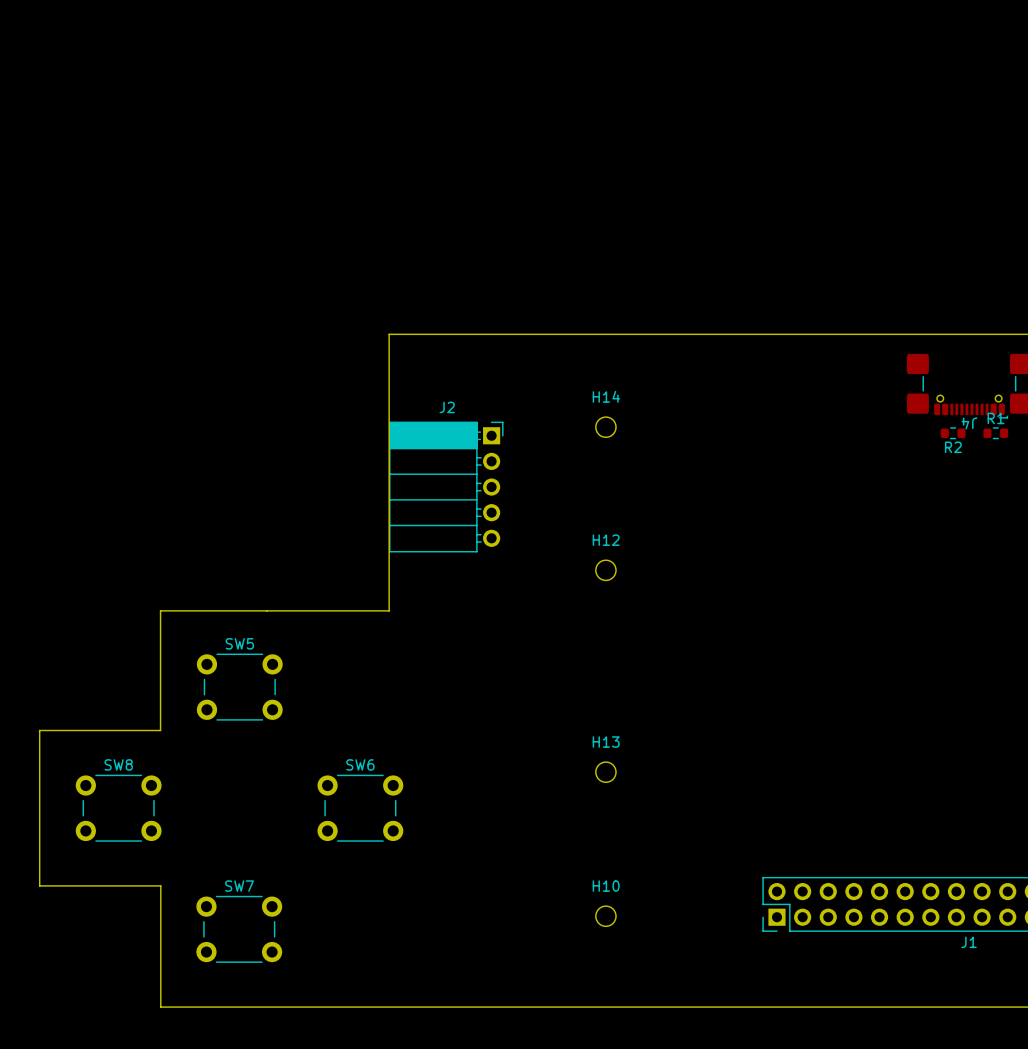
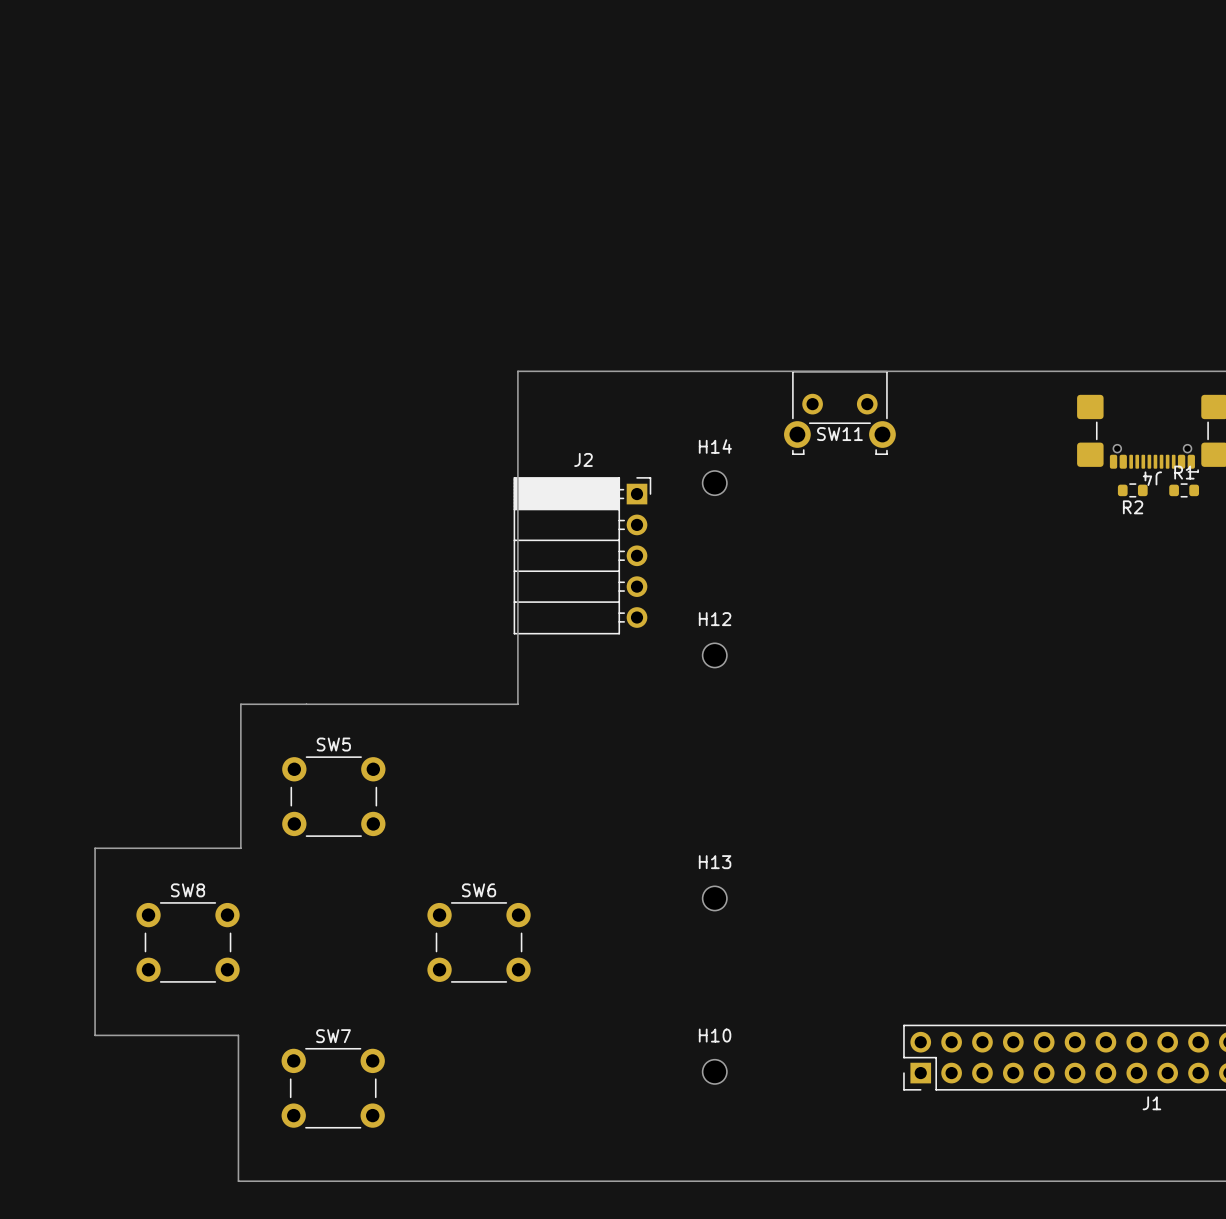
board edge: (442, 334) (389, 334) (389, 610) -> (517, 371) (517, 704) (453, 704)
SW11: none -> (839, 412)
J2 position: (446, 487) -> (582, 555)
board edge: (212, 610) (160, 610) (160, 730) -> (240, 704) (240, 848) (178, 848)
SW5 position: (239, 687) -> (333, 796)
board edge: (91, 730) (39, 730) (39, 885) (91, 885) -> (95, 848) (95, 1035)
SW8 position: (118, 808) -> (188, 942)
SW6 position: (360, 808) -> (479, 942)
board edge: (160, 885) (160, 1007) (210, 1007) -> (178, 1035) (238, 1035) (238, 1181)
SW7 position: (239, 929) -> (333, 1088)

